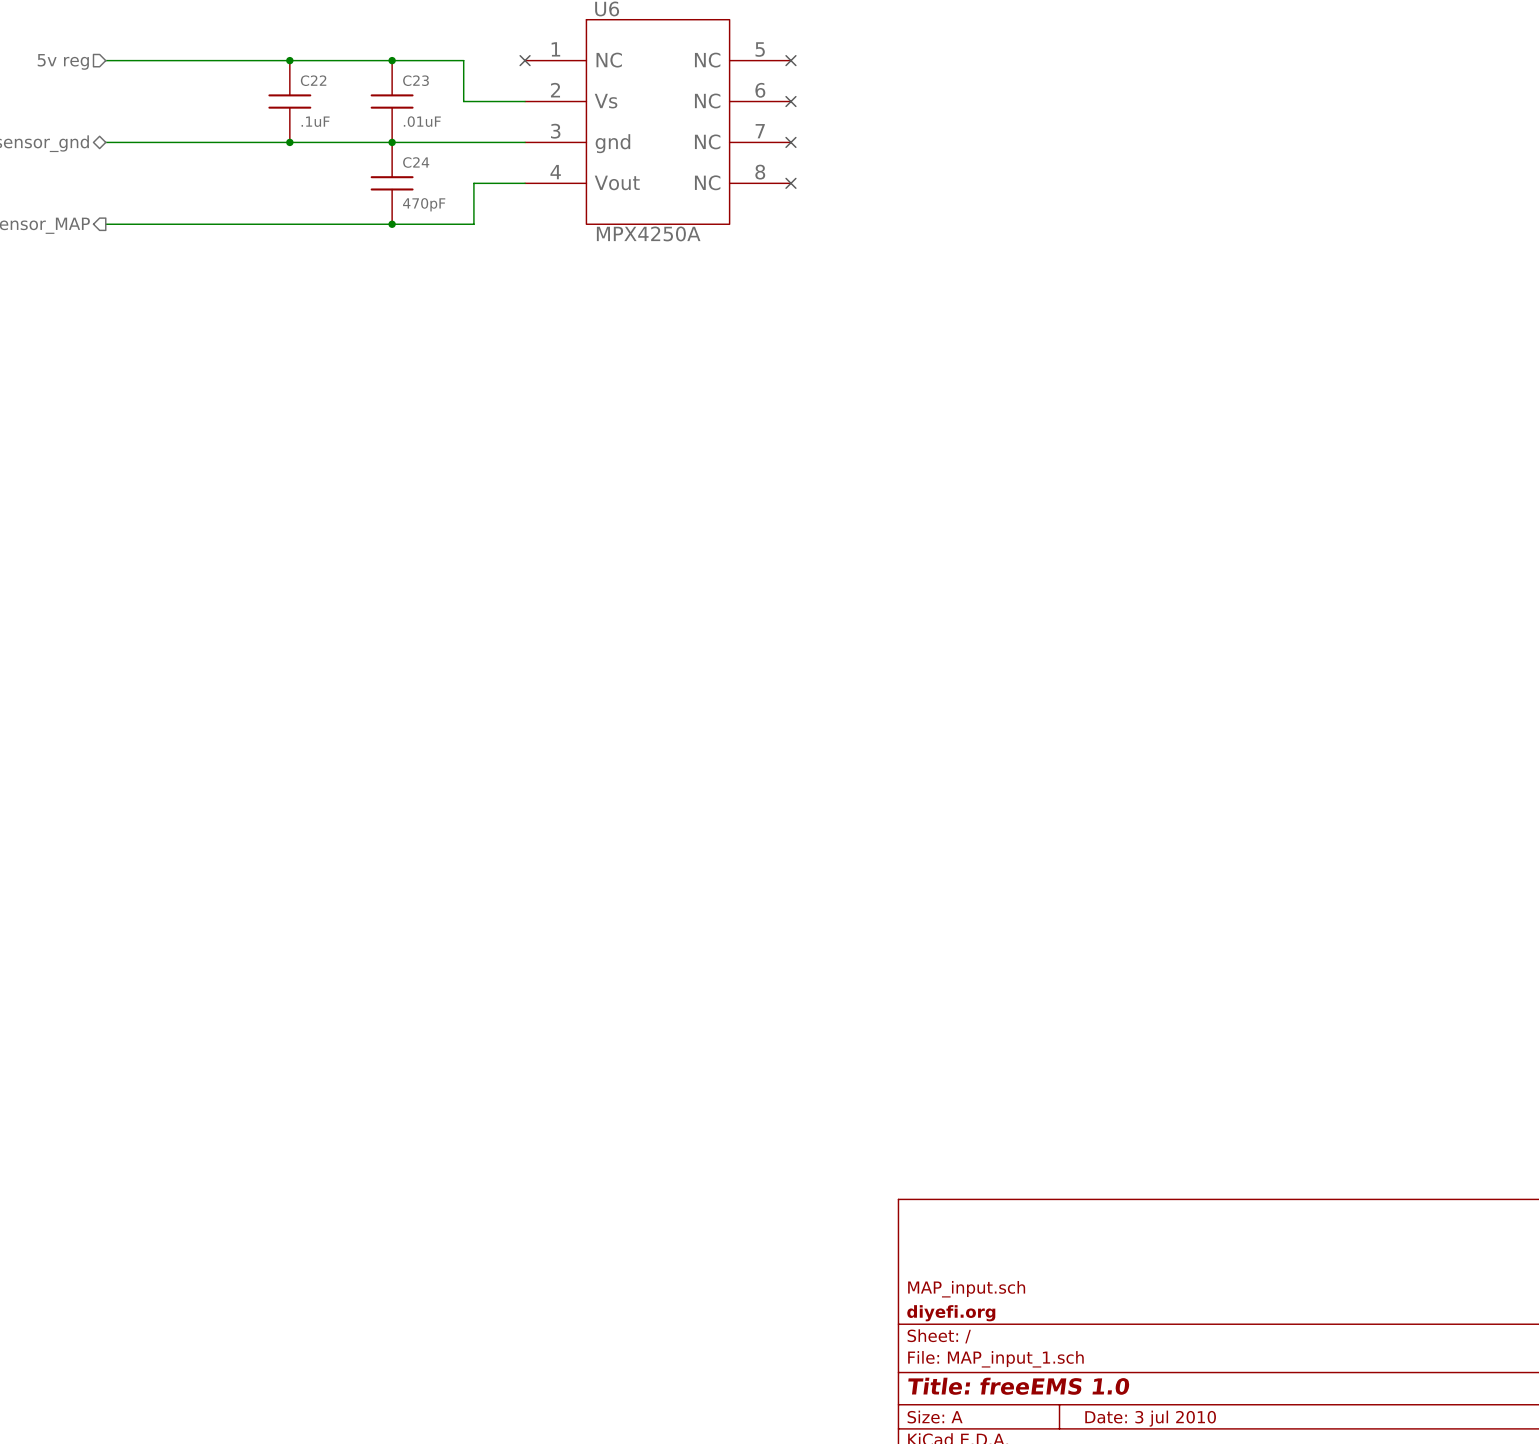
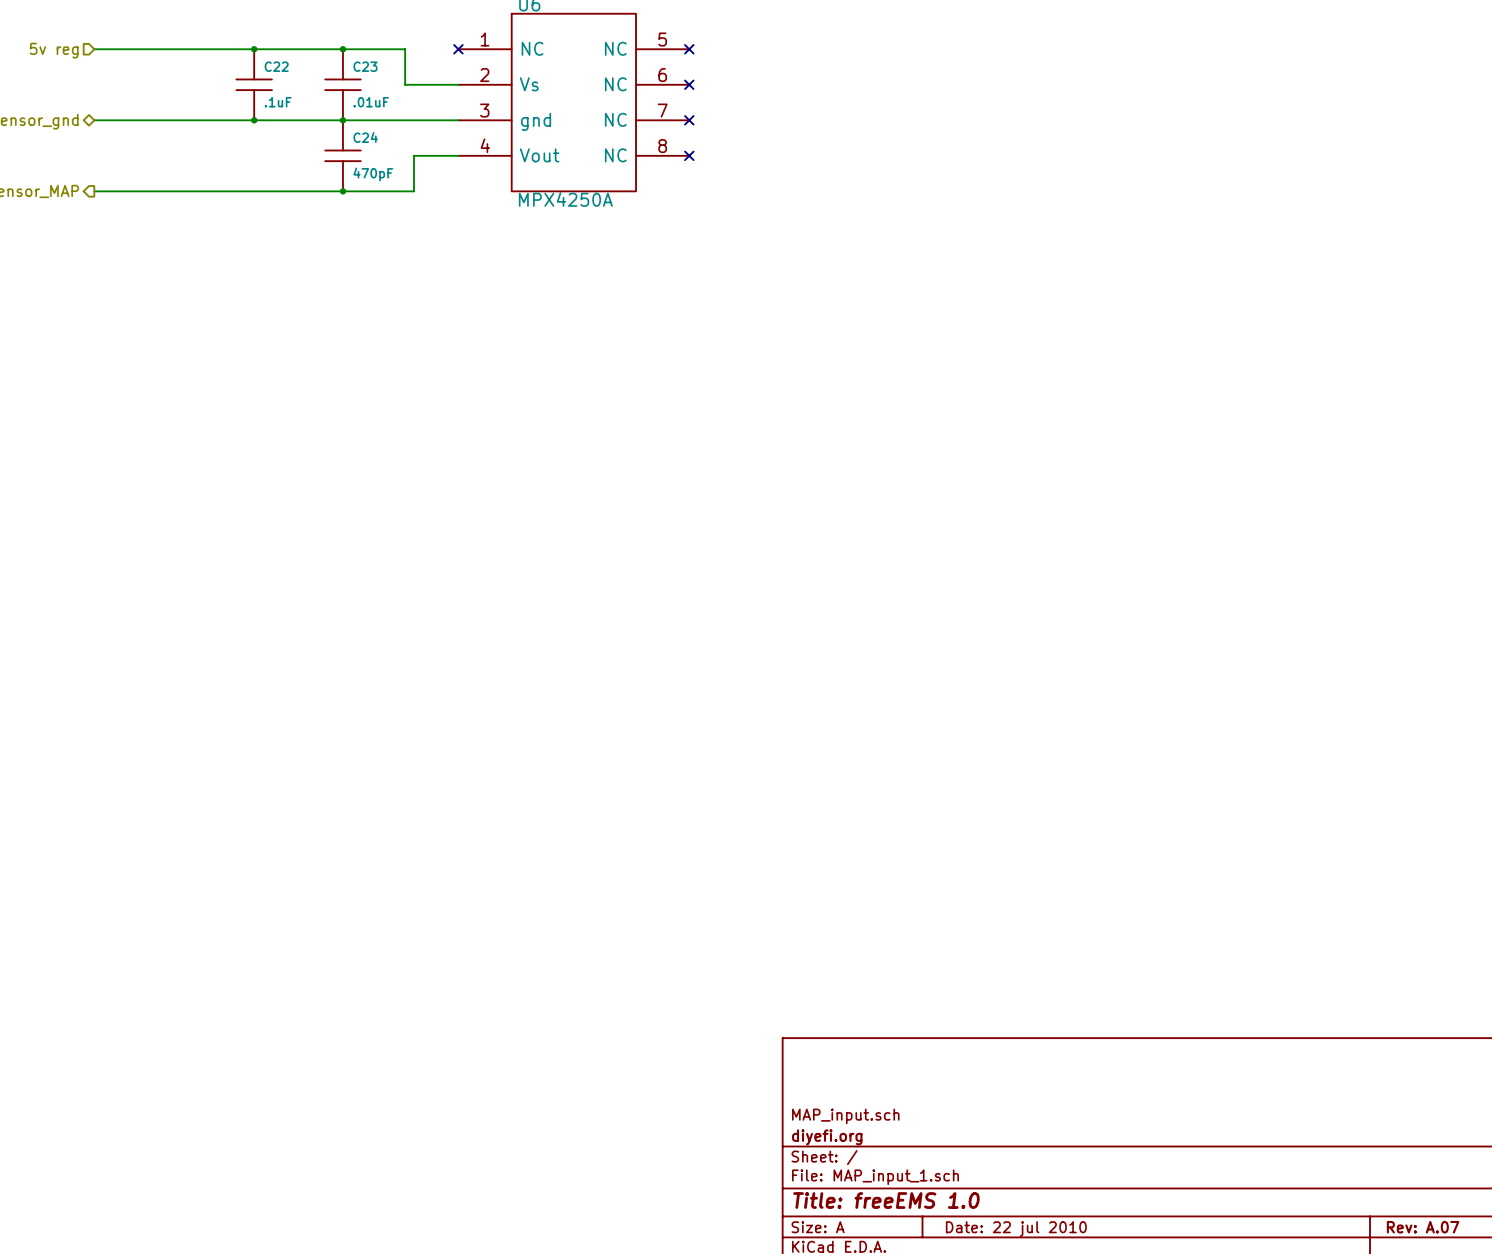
title block: Date: 3 jul 2010 (1150, 1418) -> Date: 22 jul 2010 (1016, 1228)

